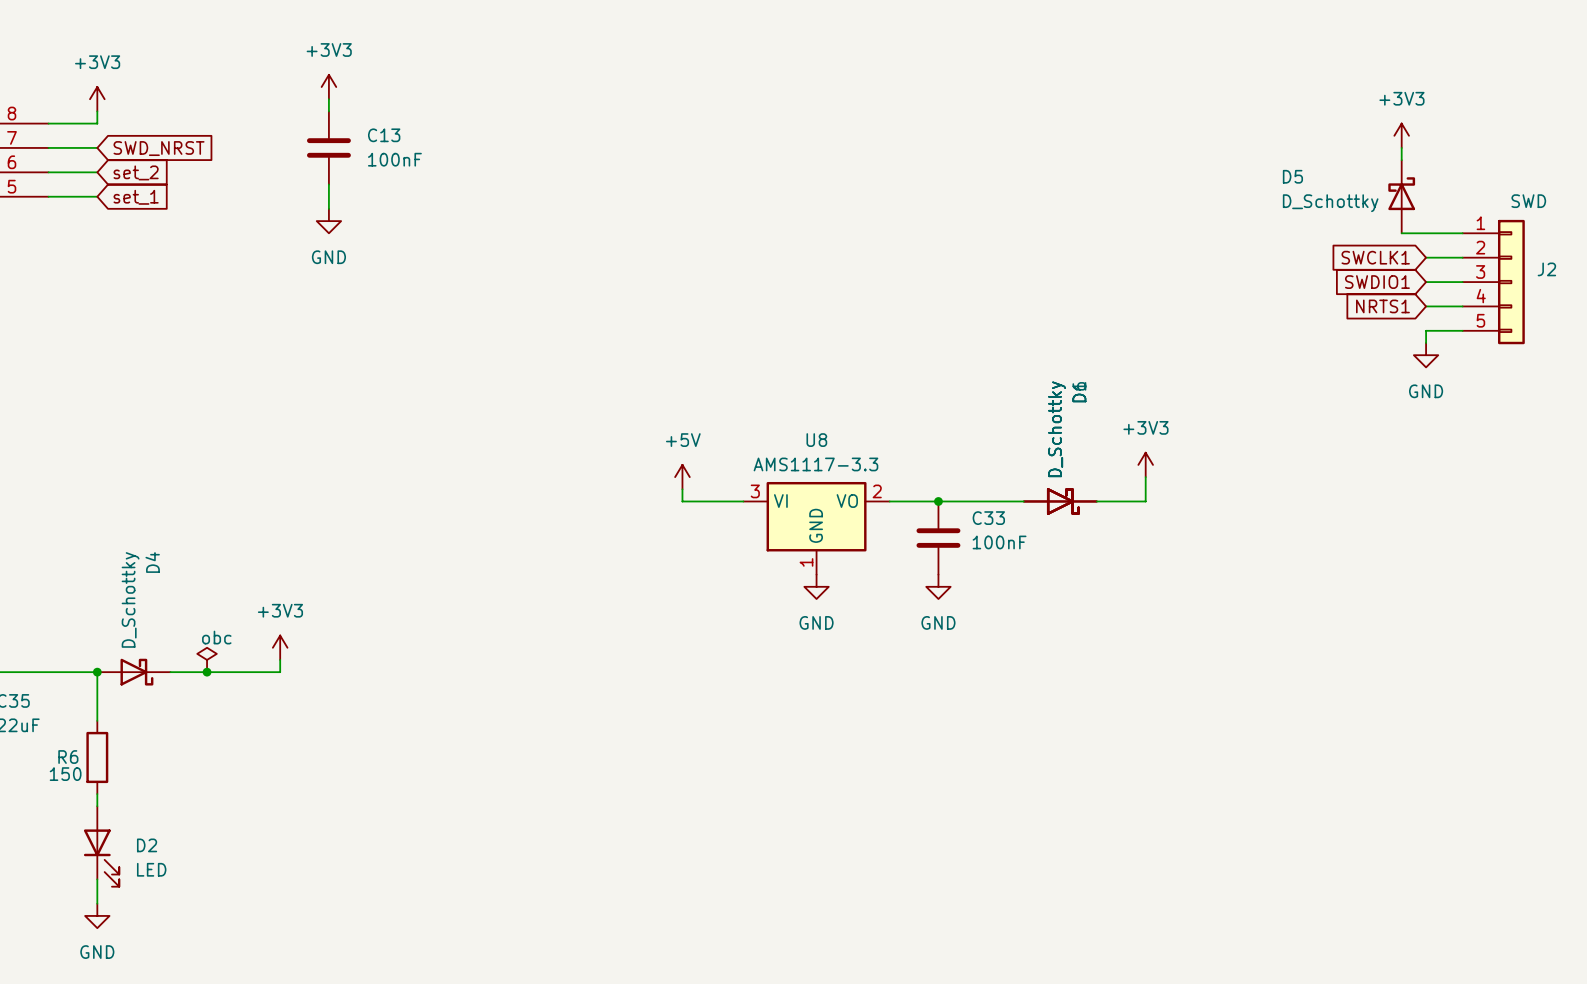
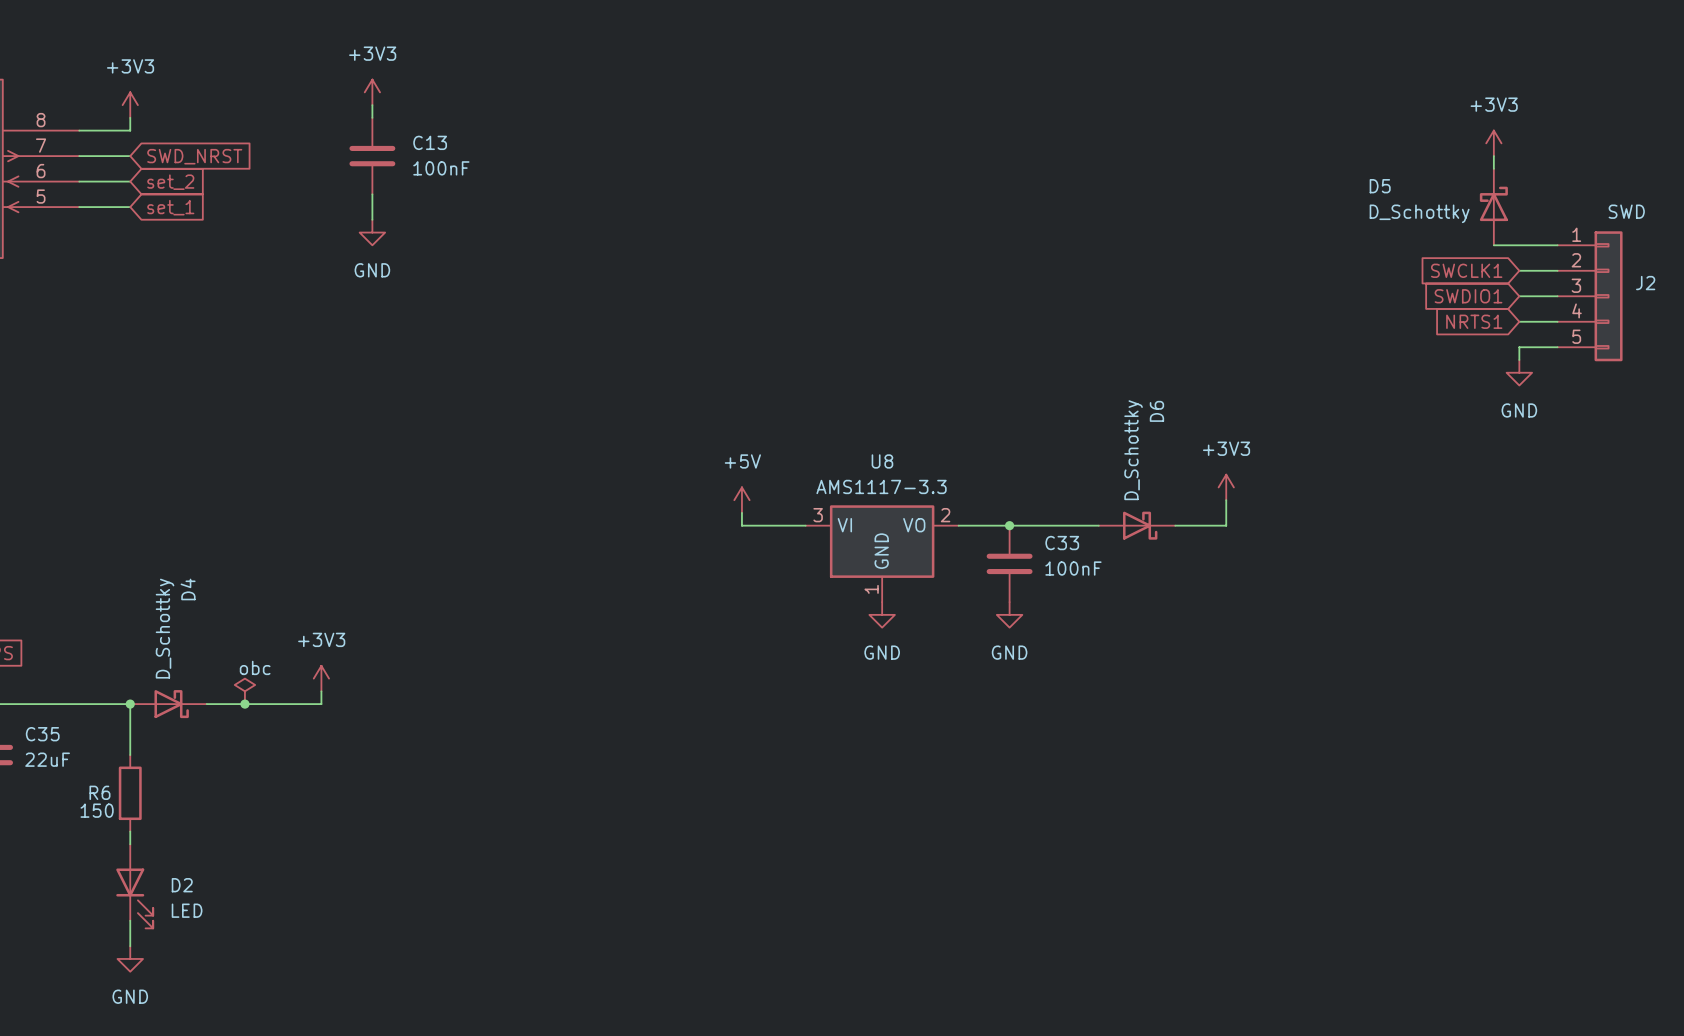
part: D_Schottky (1060, 501) -> none

